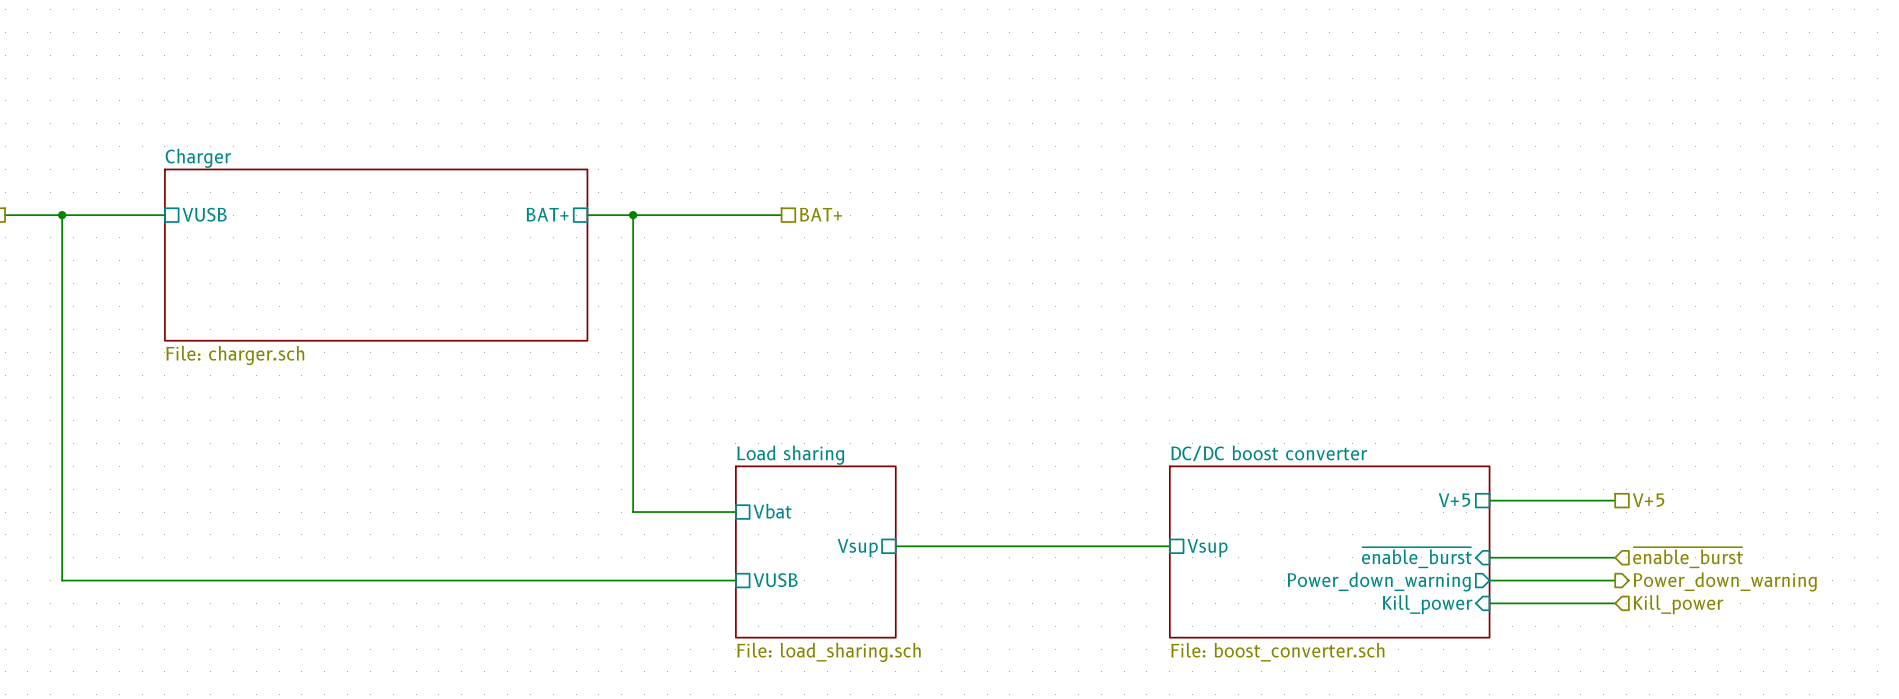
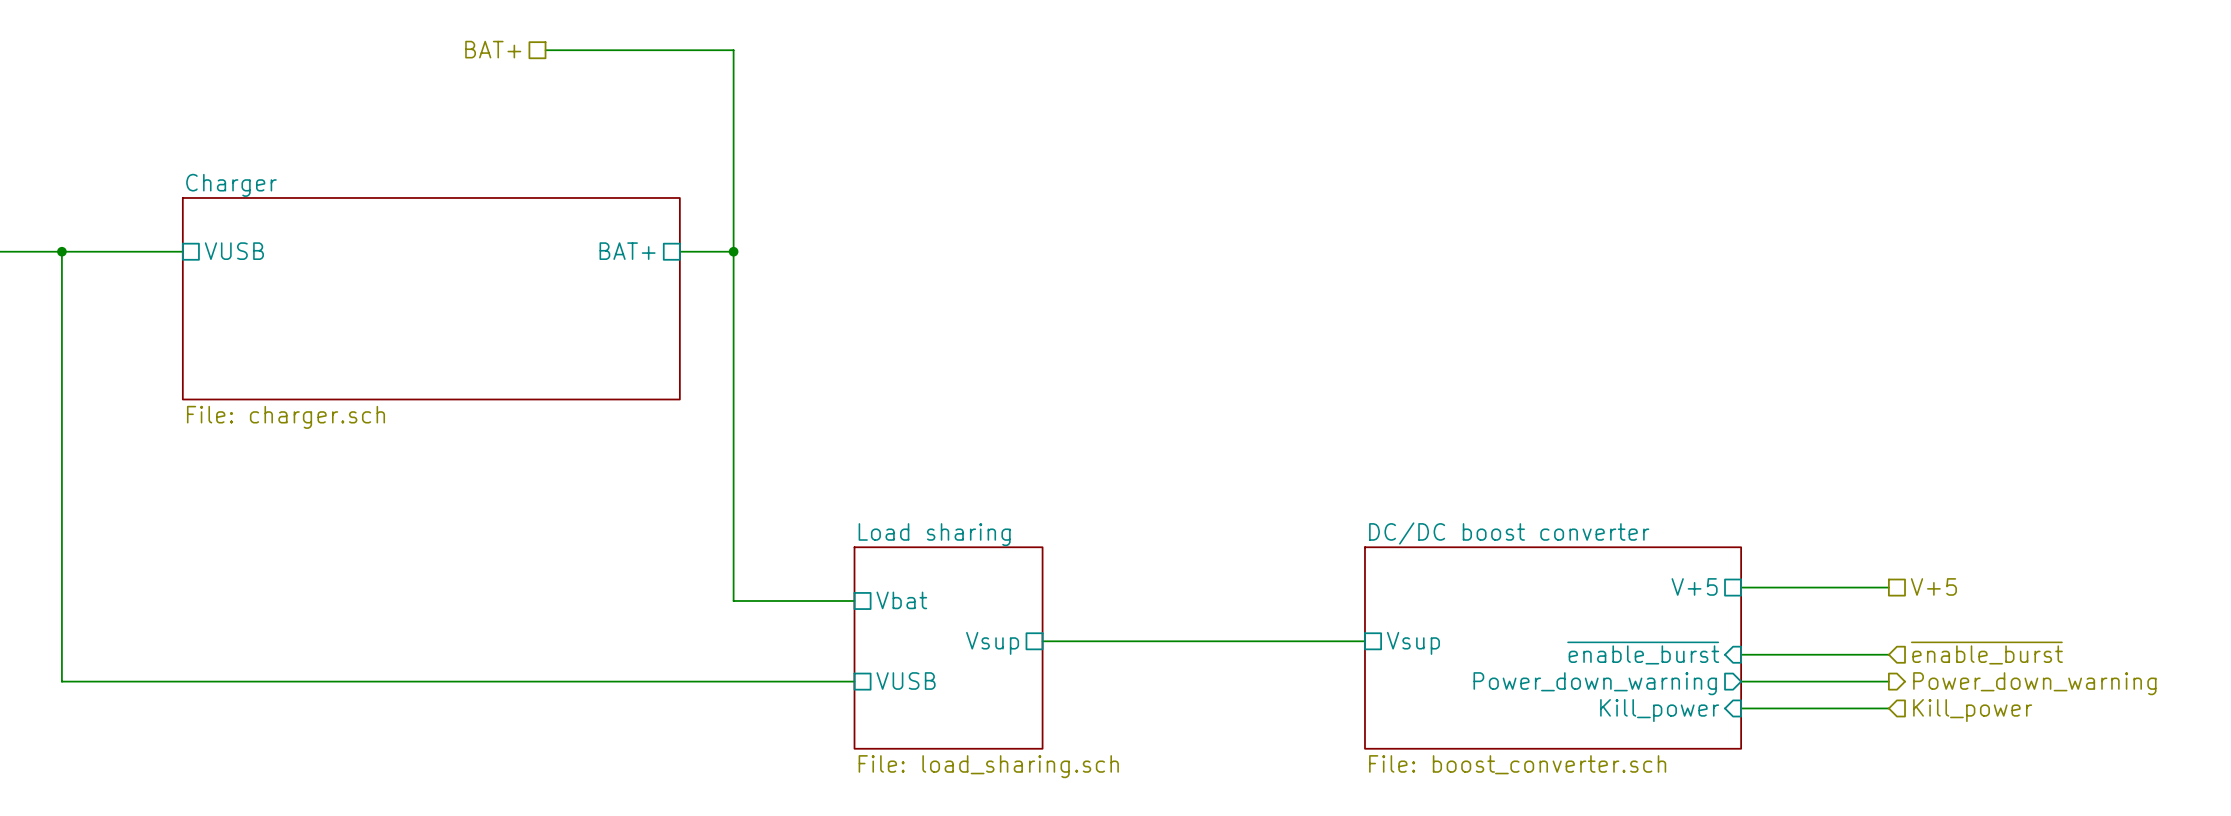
hierarchical label: none -> BAT+ (493, 49)
hierarchical label: BAT+ (821, 214) -> none
wire: (633, 215) (781, 215) -> (733, 251) (733, 50) (545, 50)

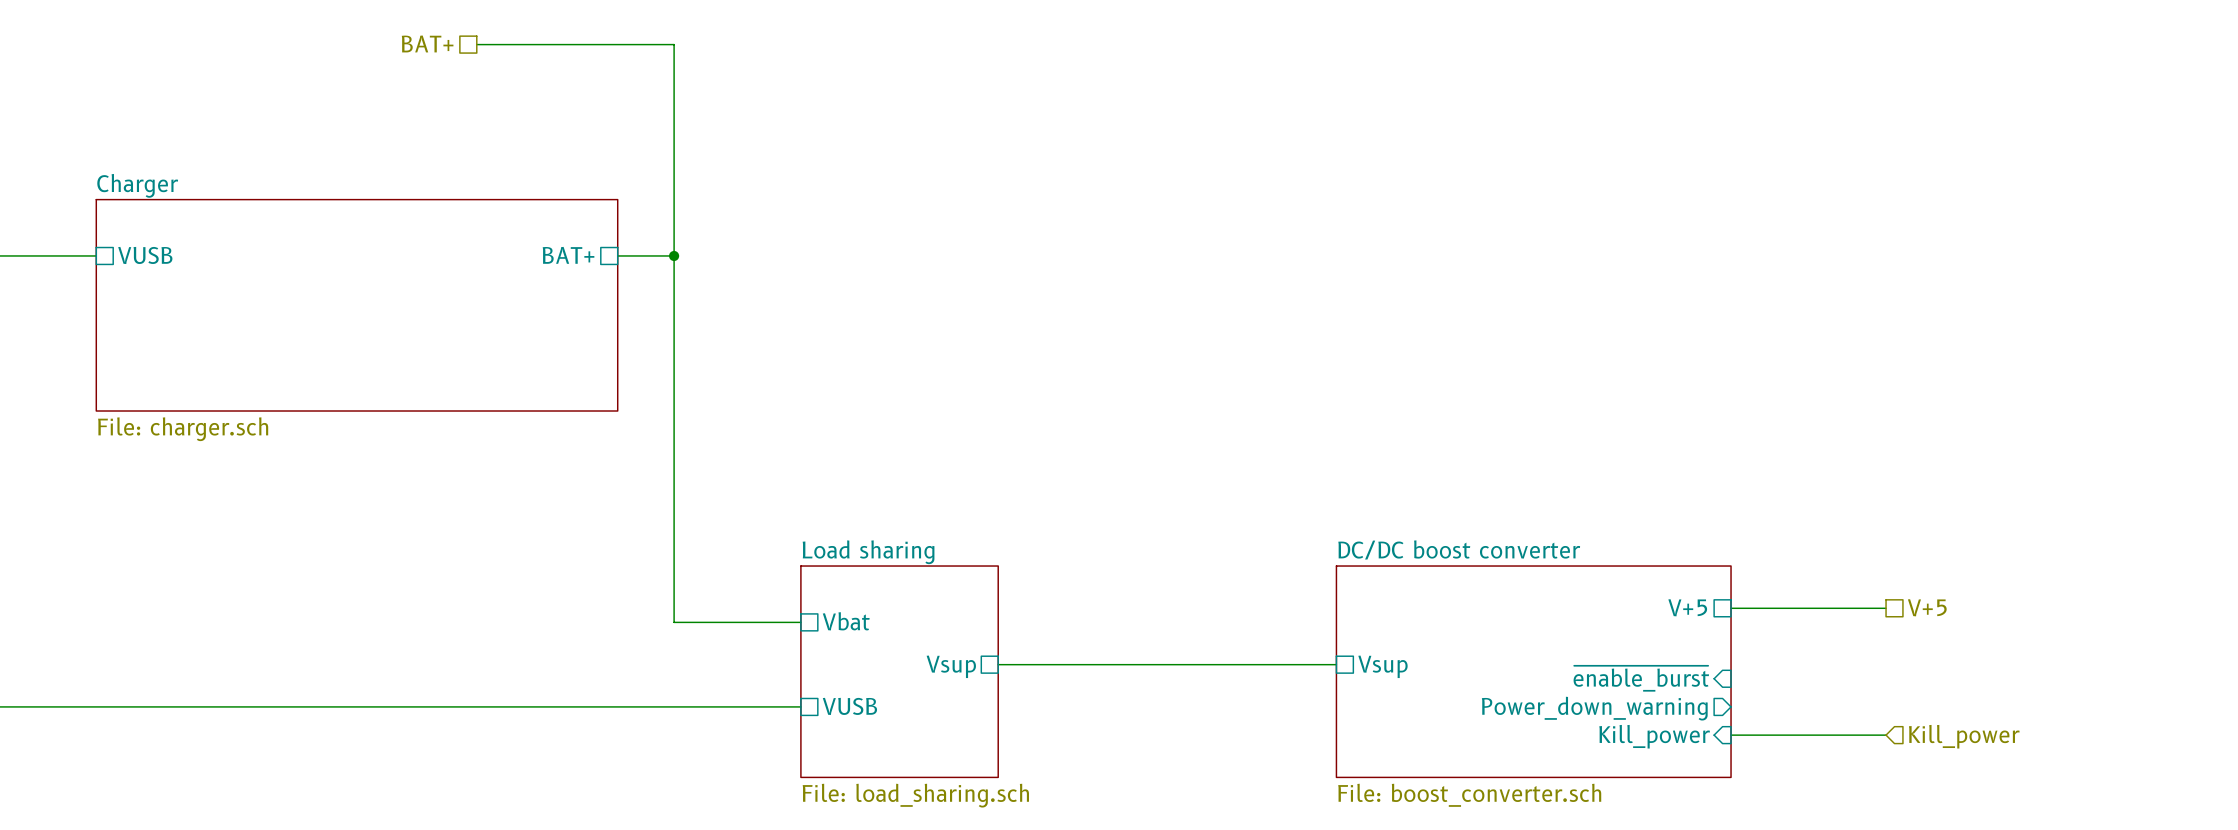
hierarchical label: ~{enable_burst} (1986, 653) -> none
wire: (1741, 654) (1888, 654) -> none
wire: (1741, 681) (1888, 681) -> none
hierarchical label: Power_down_warning (2034, 683) -> none

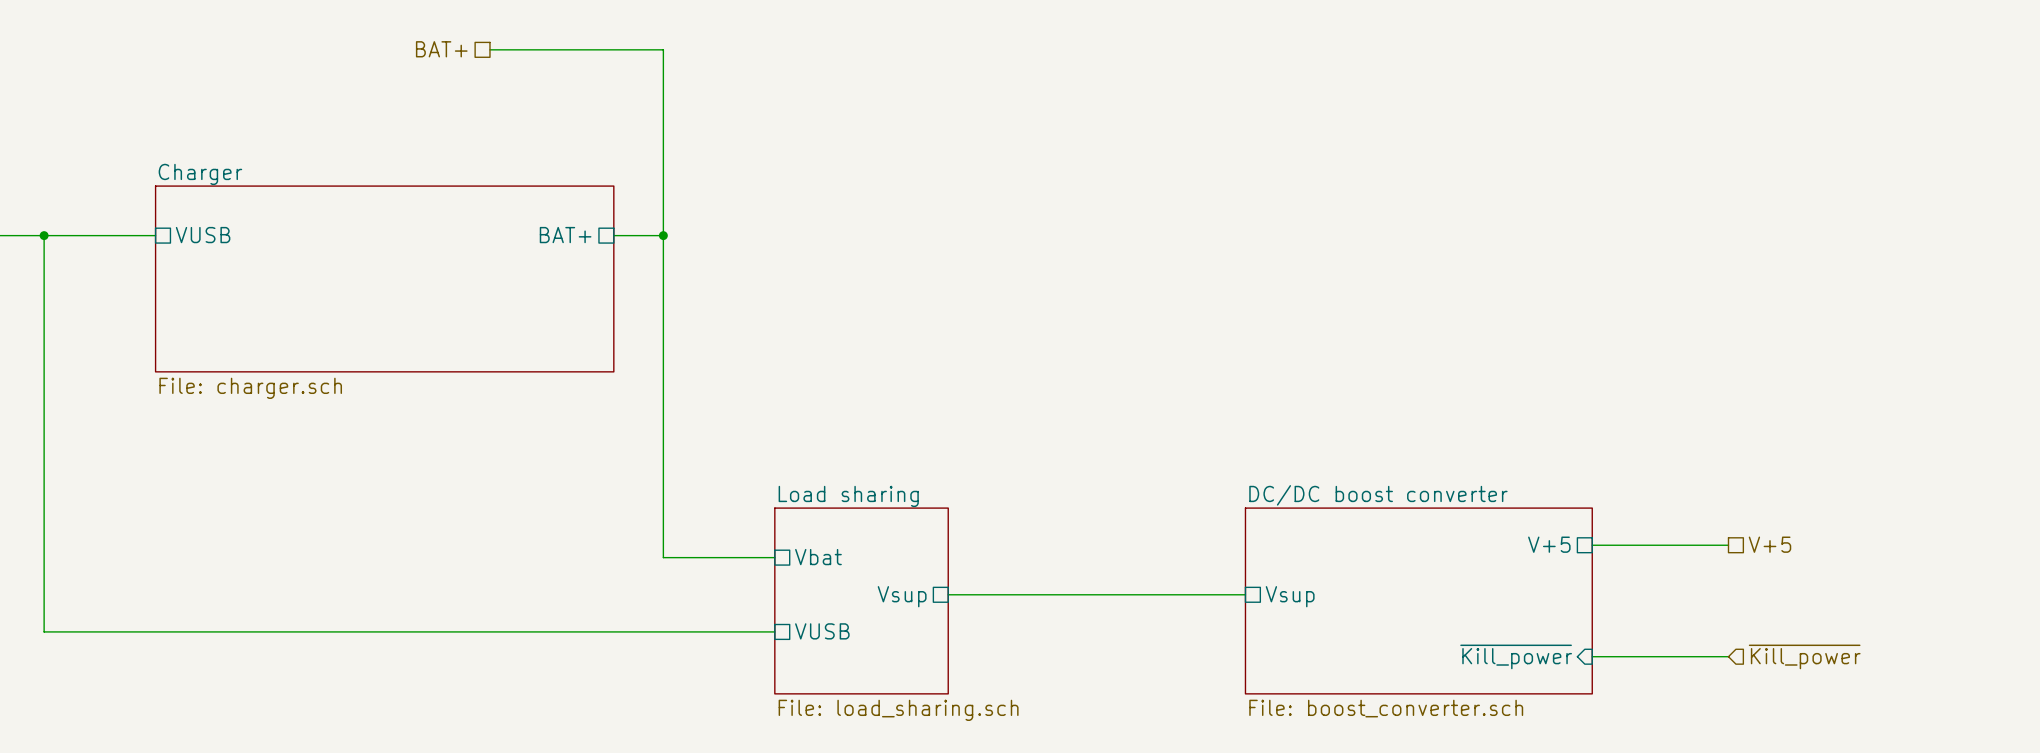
sheet pin: ~{enable_burst} (1641, 678) -> none
sheet pin: Power_down_warning (1594, 708) -> none
sheet pin: Kill_power (1654, 736) -> ~{Kill_power} (1516, 656)
hierarchical label: Kill_power (1964, 736) -> ~{Kill_power} (1804, 656)

